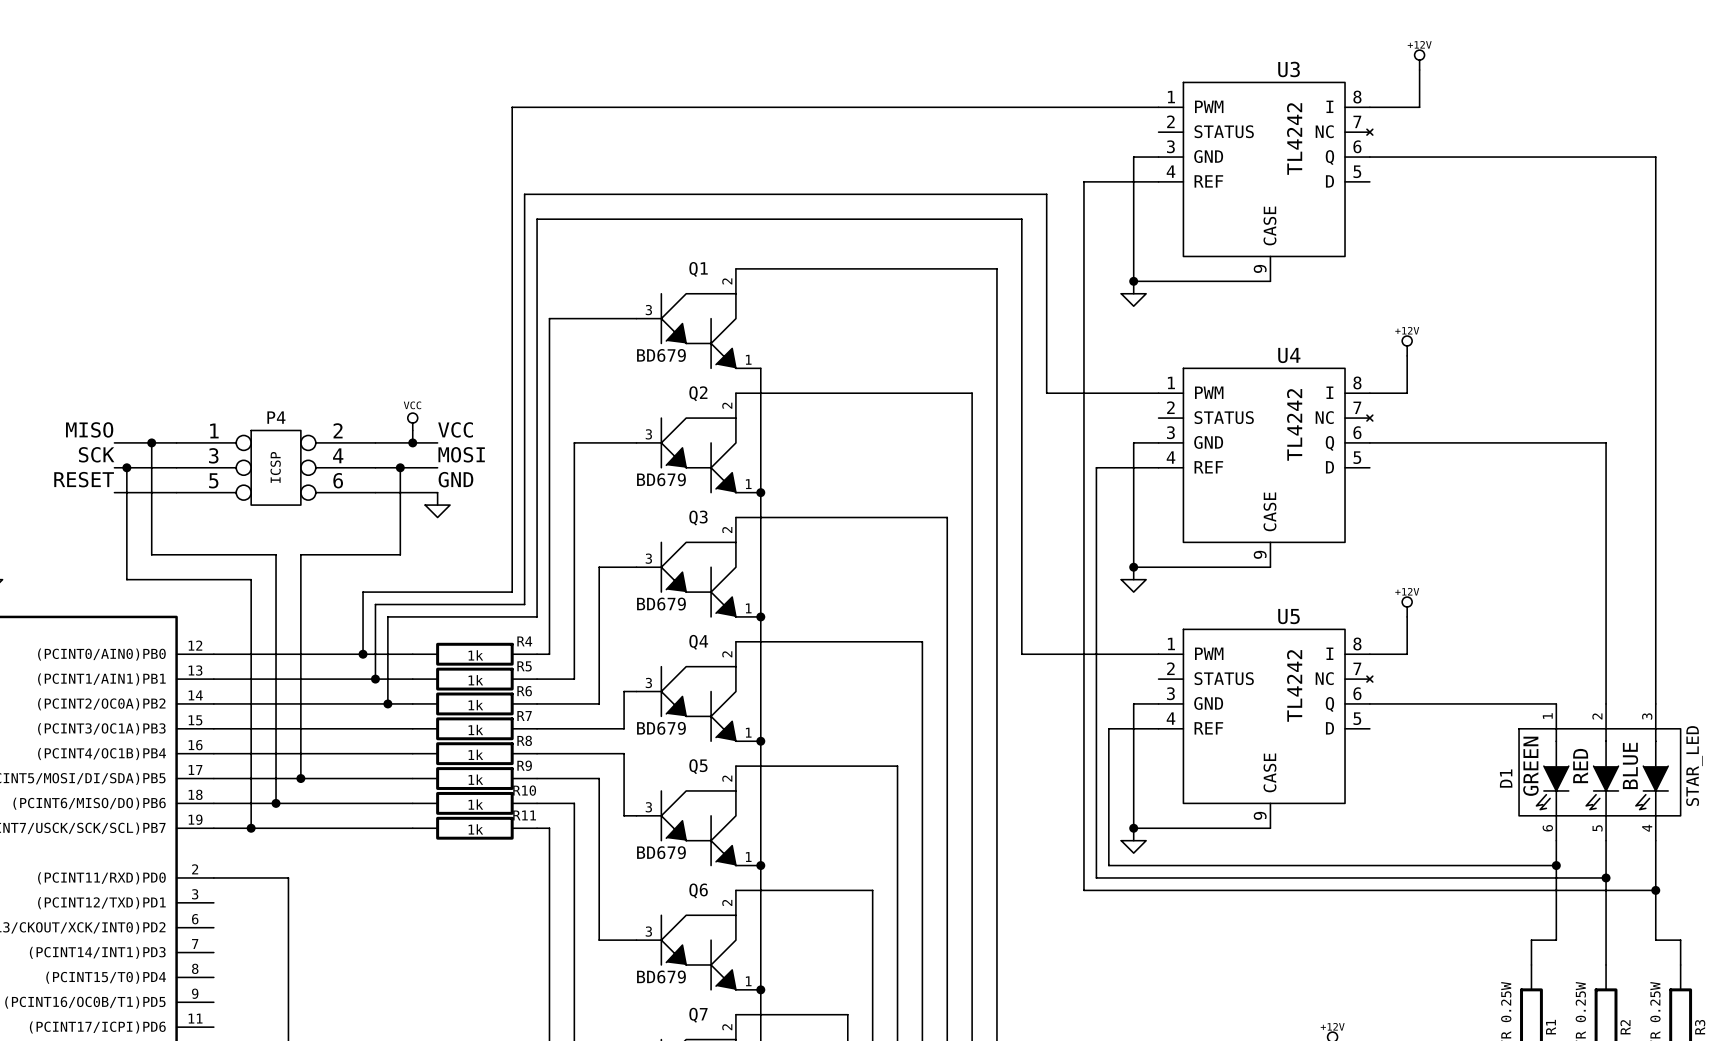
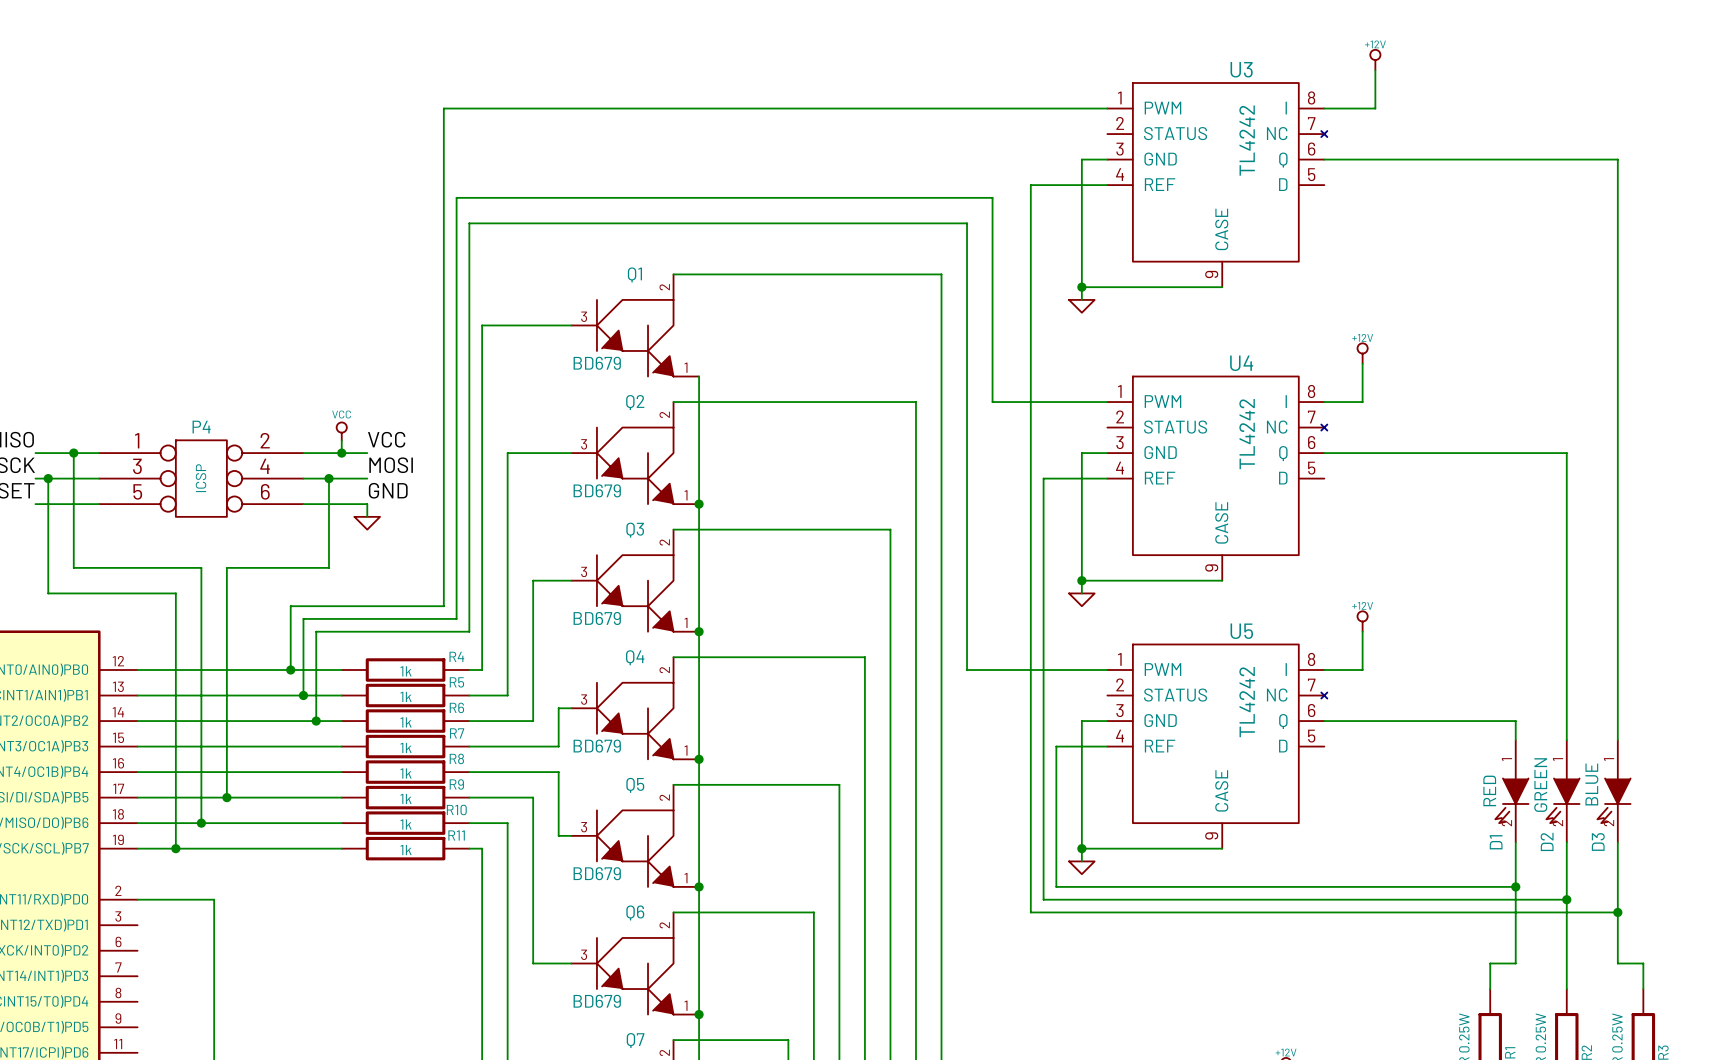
D1 symbol: [1519, 703, 1681, 841] -> [1495, 740, 1529, 843]
D1 value: STAR_LED (1694, 766) -> RED (1489, 790)
D2: none -> GREEN (1562, 791)
D3: none -> BLUE (1613, 791)
D1 name position: D1 (1506, 778) -> D1 (1496, 842)

